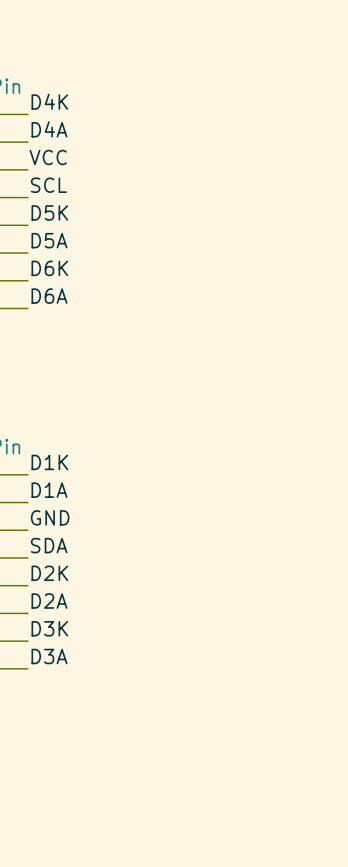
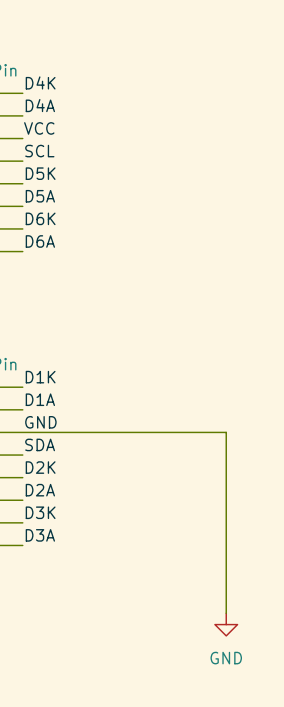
wire: none -> (22, 432) (226, 432) (226, 613)
power symbol: none -> GND (226, 624)

